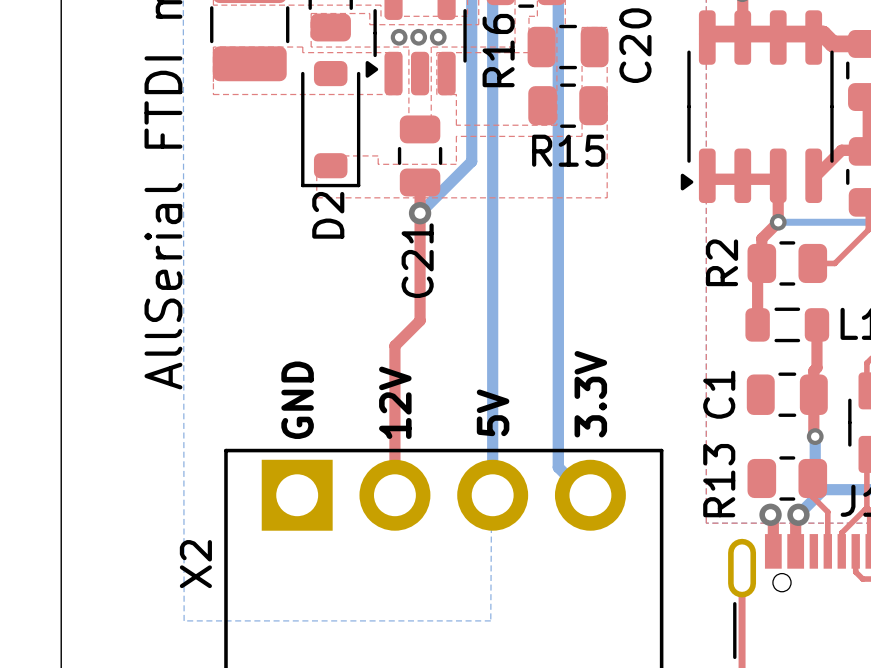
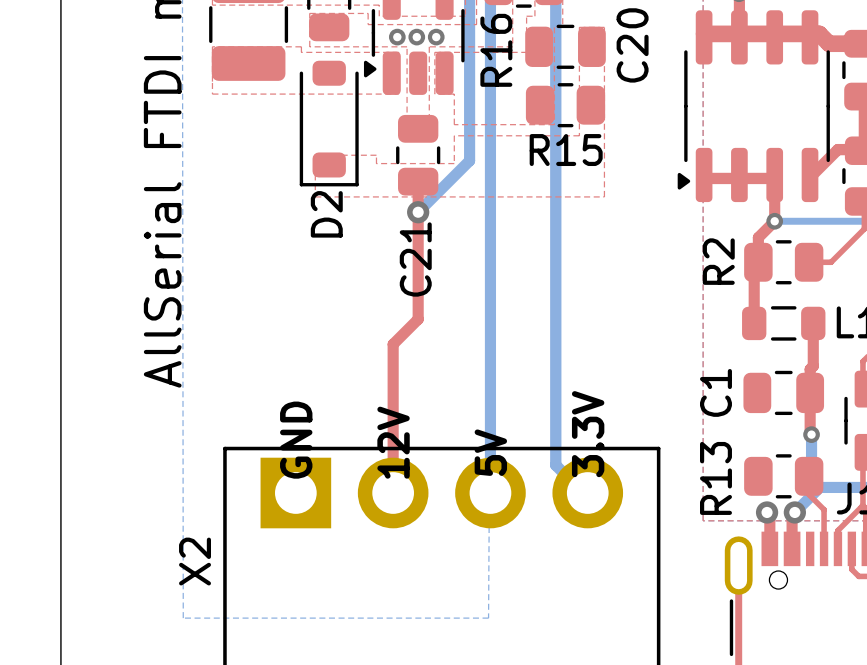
text position: 3.3V (590, 394) -> 3.3V (588, 434)
text position: GND (297, 400) -> GND (296, 440)
text position: 12V (395, 402) -> 12V (393, 442)
text position: 5V (493, 412) -> 5V (490, 452)

